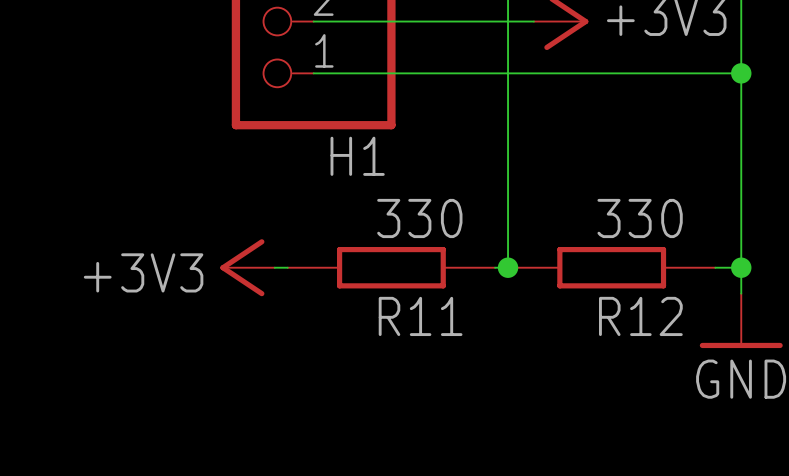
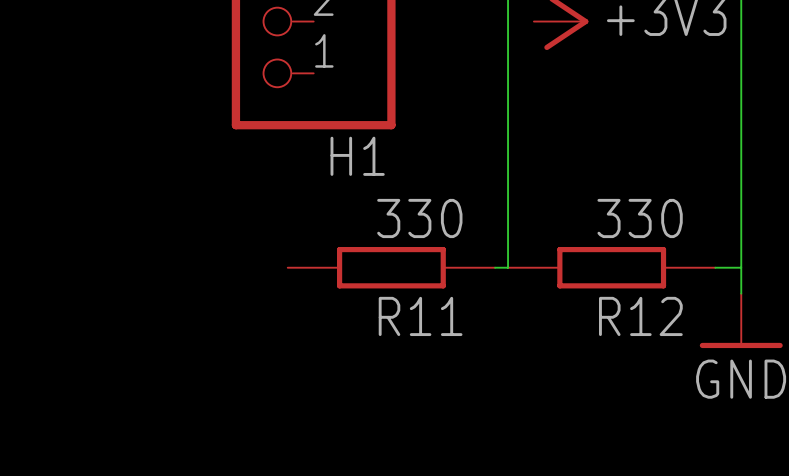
wire: (313, 21) (533, 21) -> none
wire: (313, 73) (741, 73) -> none
junction: (741, 73) -> none
power symbol: +3V3 (247, 267) -> none
wire: (274, 267) (287, 267) -> none
junction: (508, 267) -> none
junction: (741, 267) -> none

